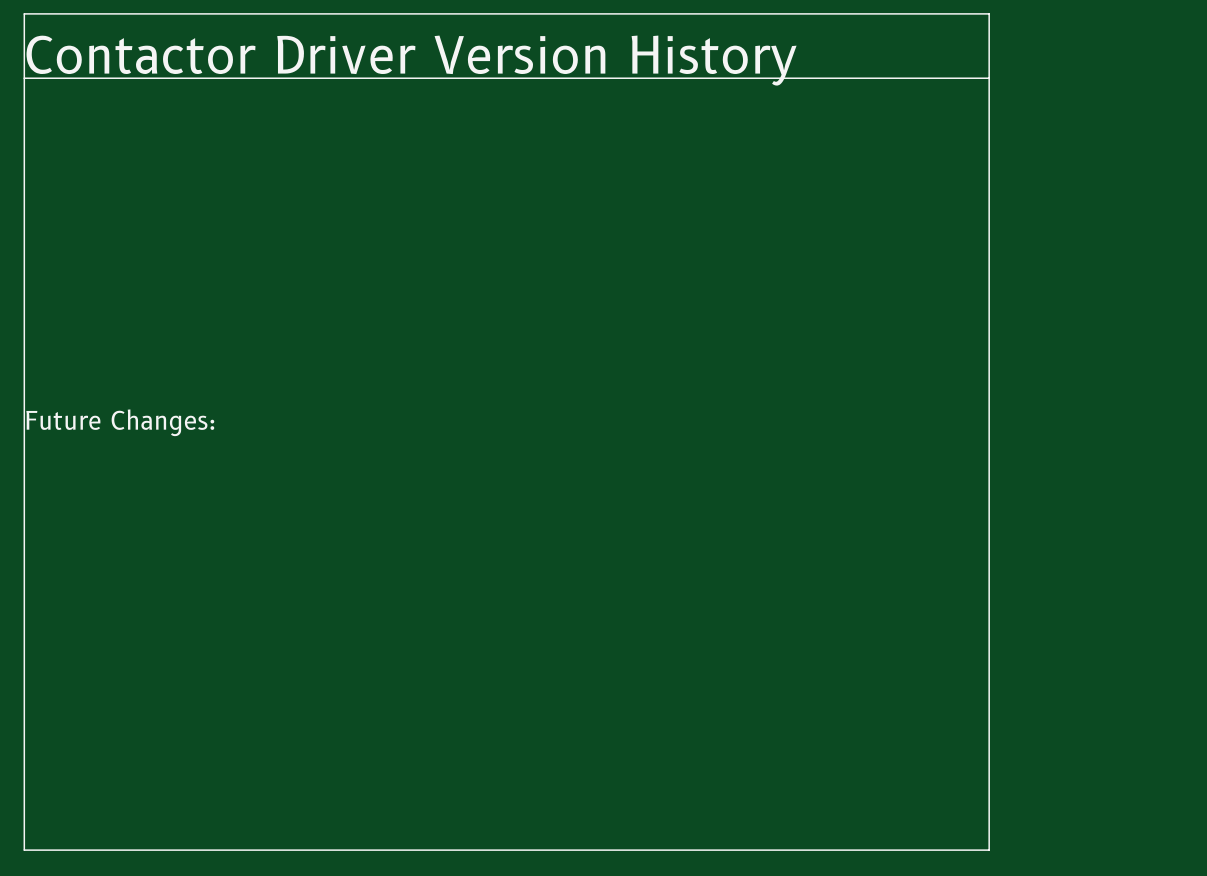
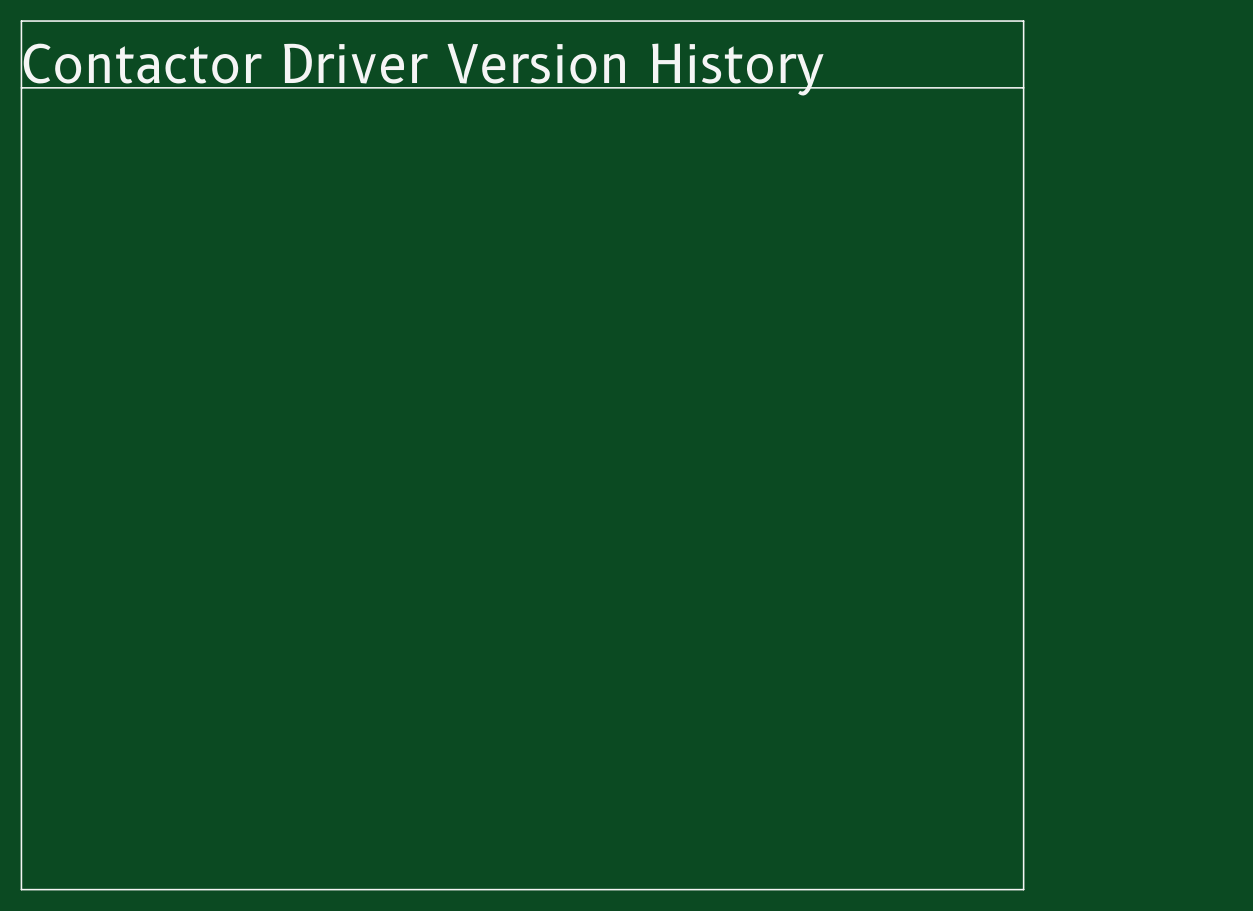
text: Future Changes: (120, 422) -> none

